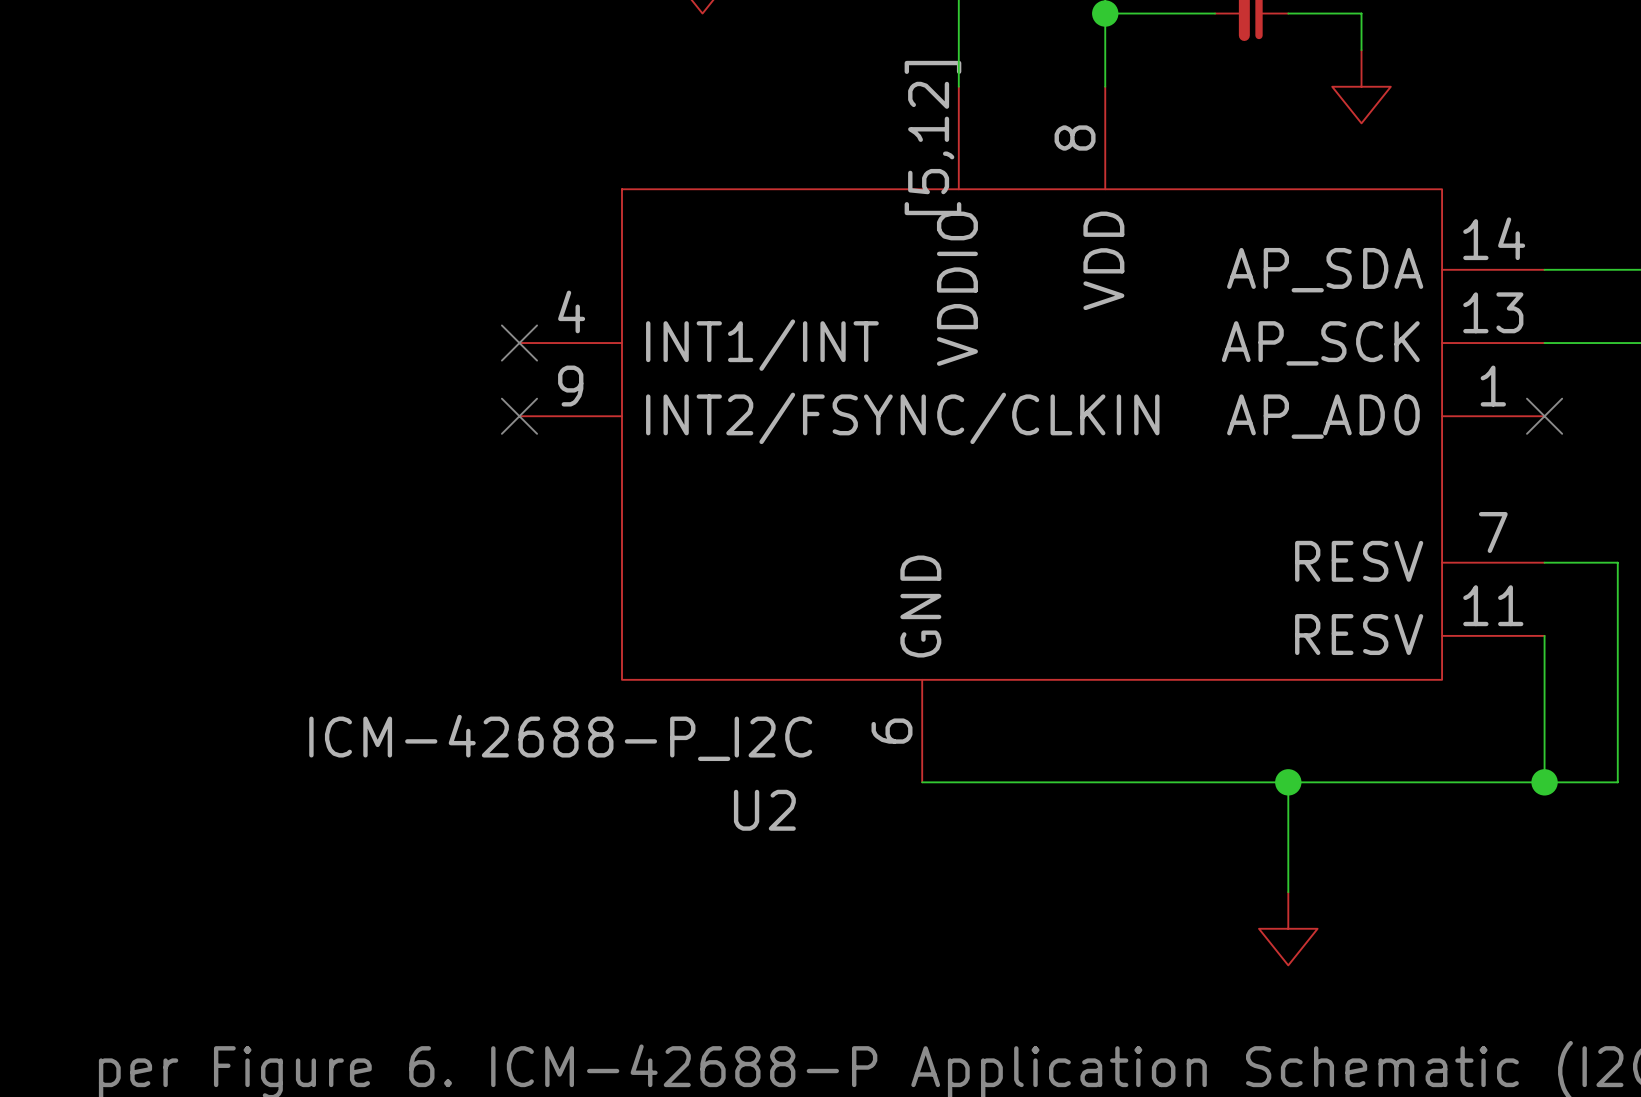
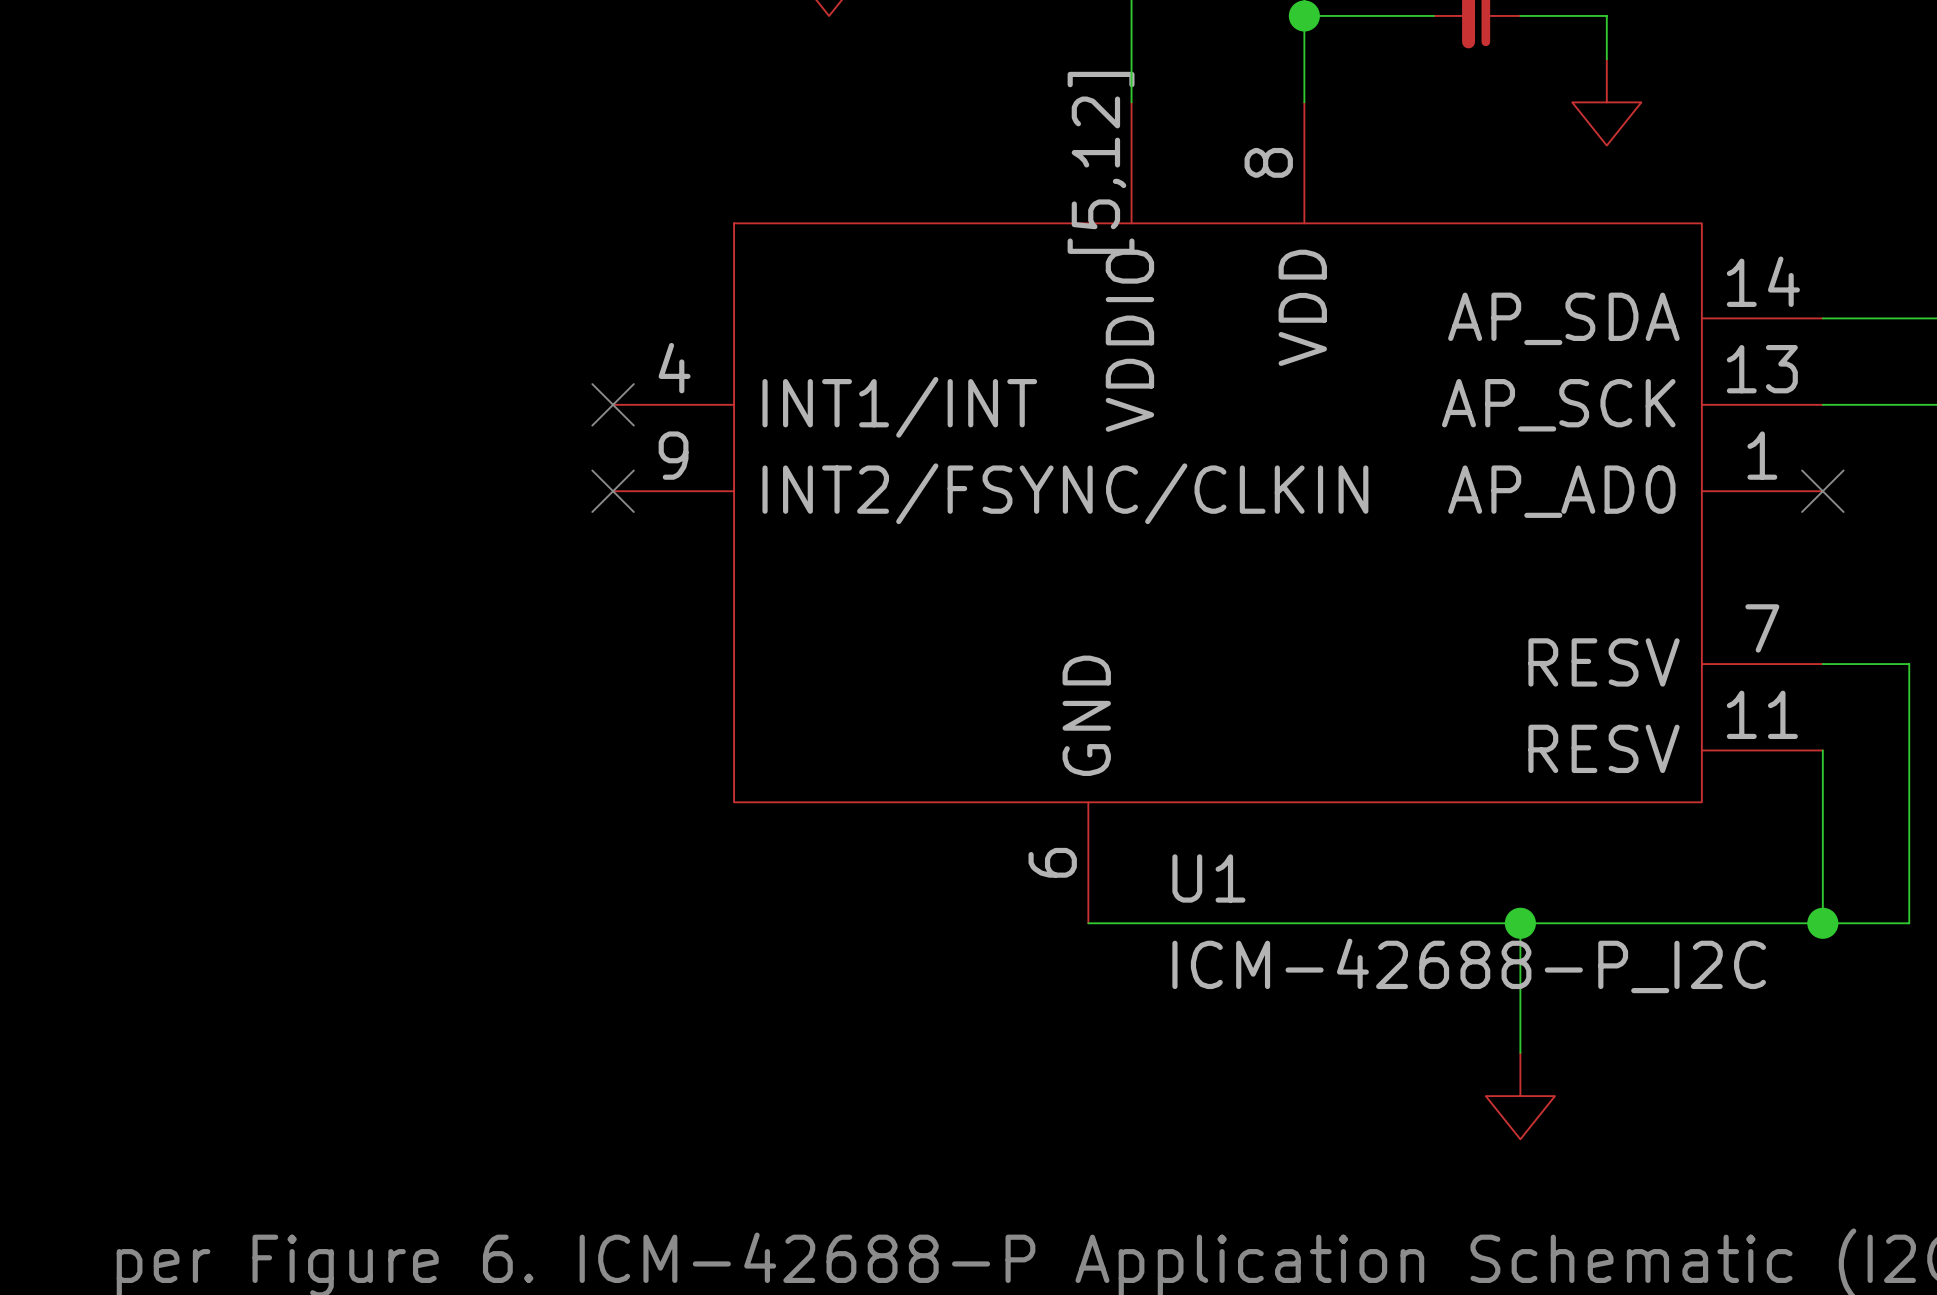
U2 value position: ICM-42688-P_I2C (560, 737) -> ICM-42688-P_I2C (1469, 965)
U2 name: U2 (764, 810) -> U1 (1208, 878)

